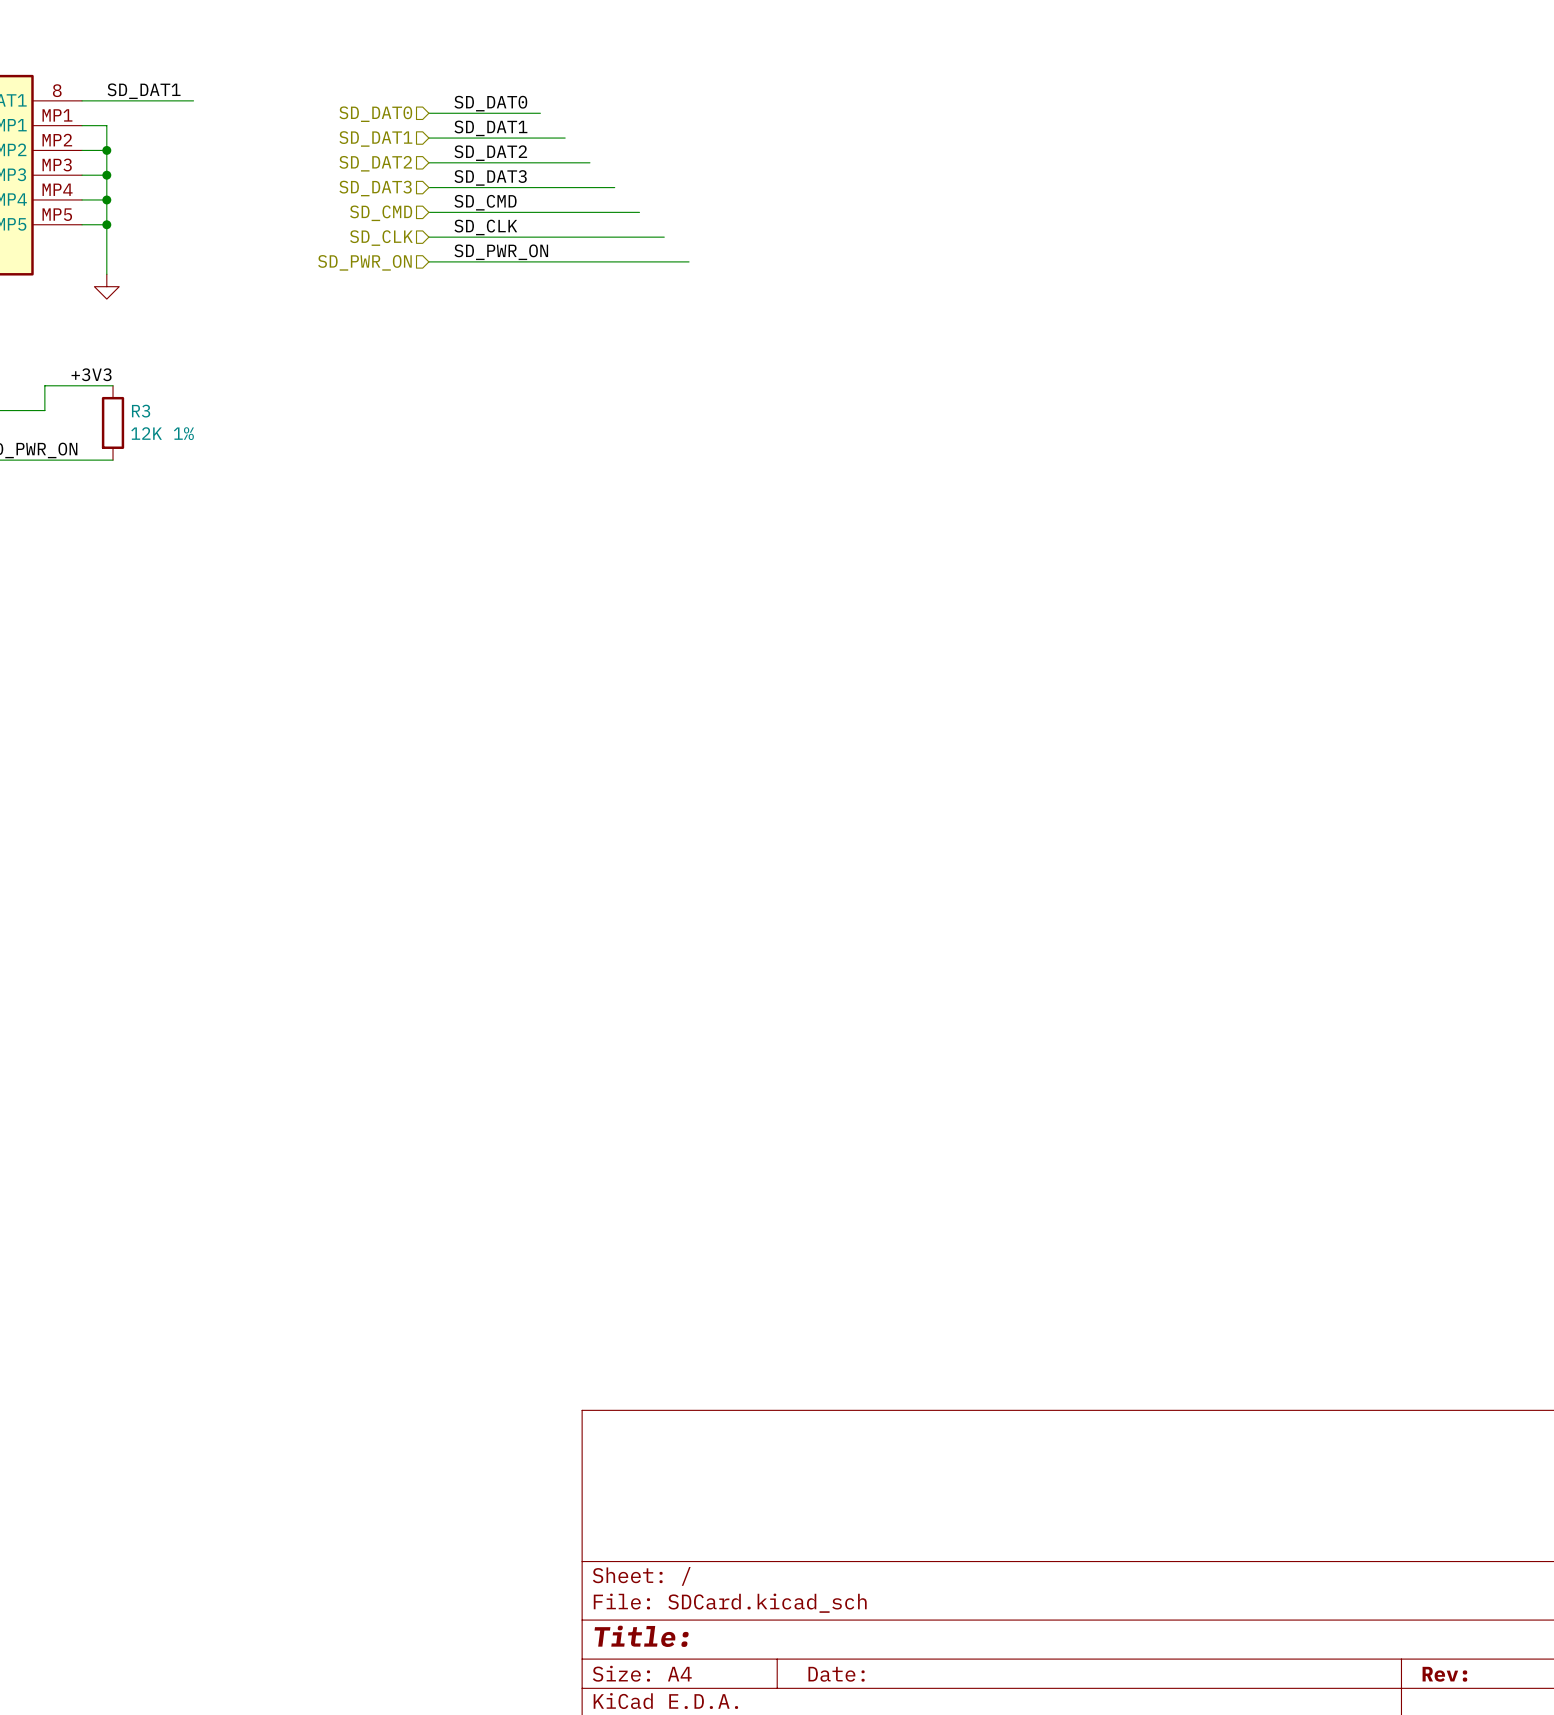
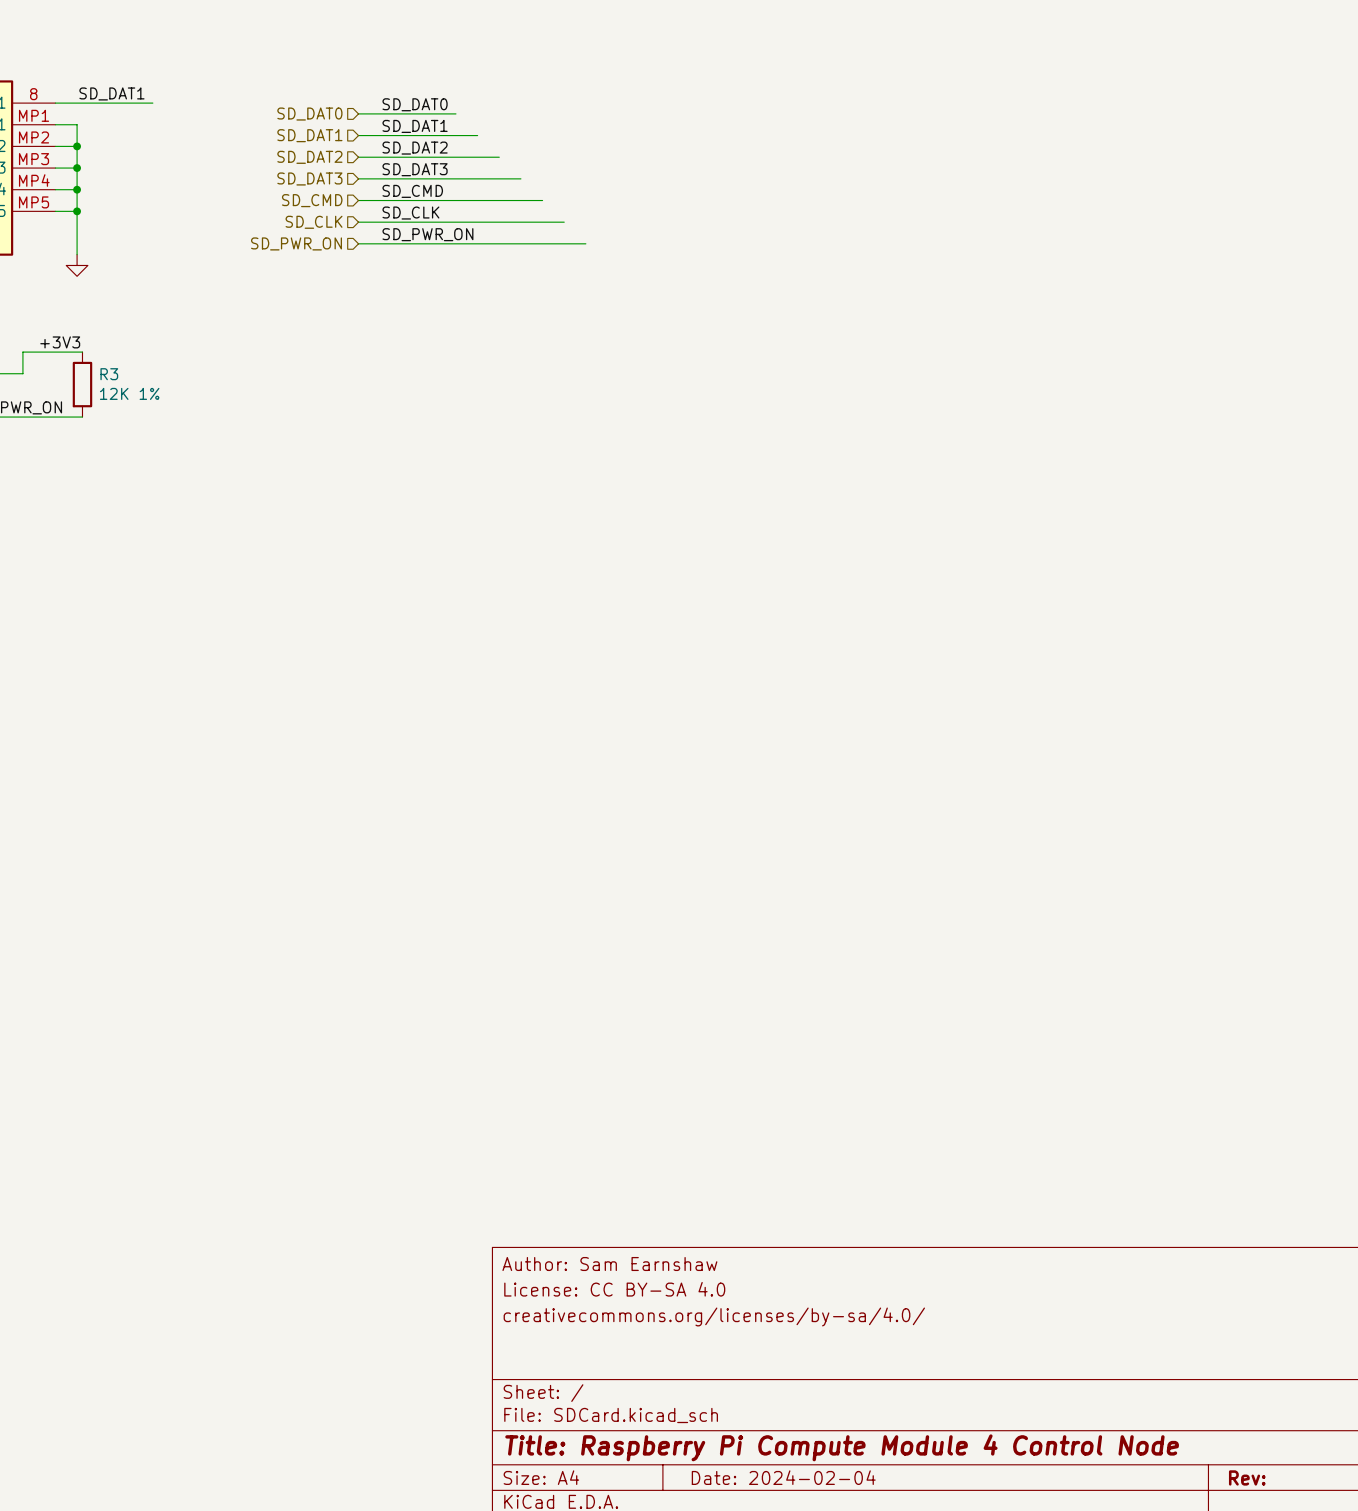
title block: none -> Author: Sam Earnshaw (609, 1264)
title block: none -> License: CC BY-SA 4.0 (614, 1289)
title block: none -> creativecommons.org/licenses/by-sa/4.0/ (714, 1316)
title block: Title: (641, 1636) -> Title: Raspberry Pi Compute Module 4 Control Node (842, 1447)
title block: Date: (836, 1674) -> Date: 2024-02-04 (783, 1477)

